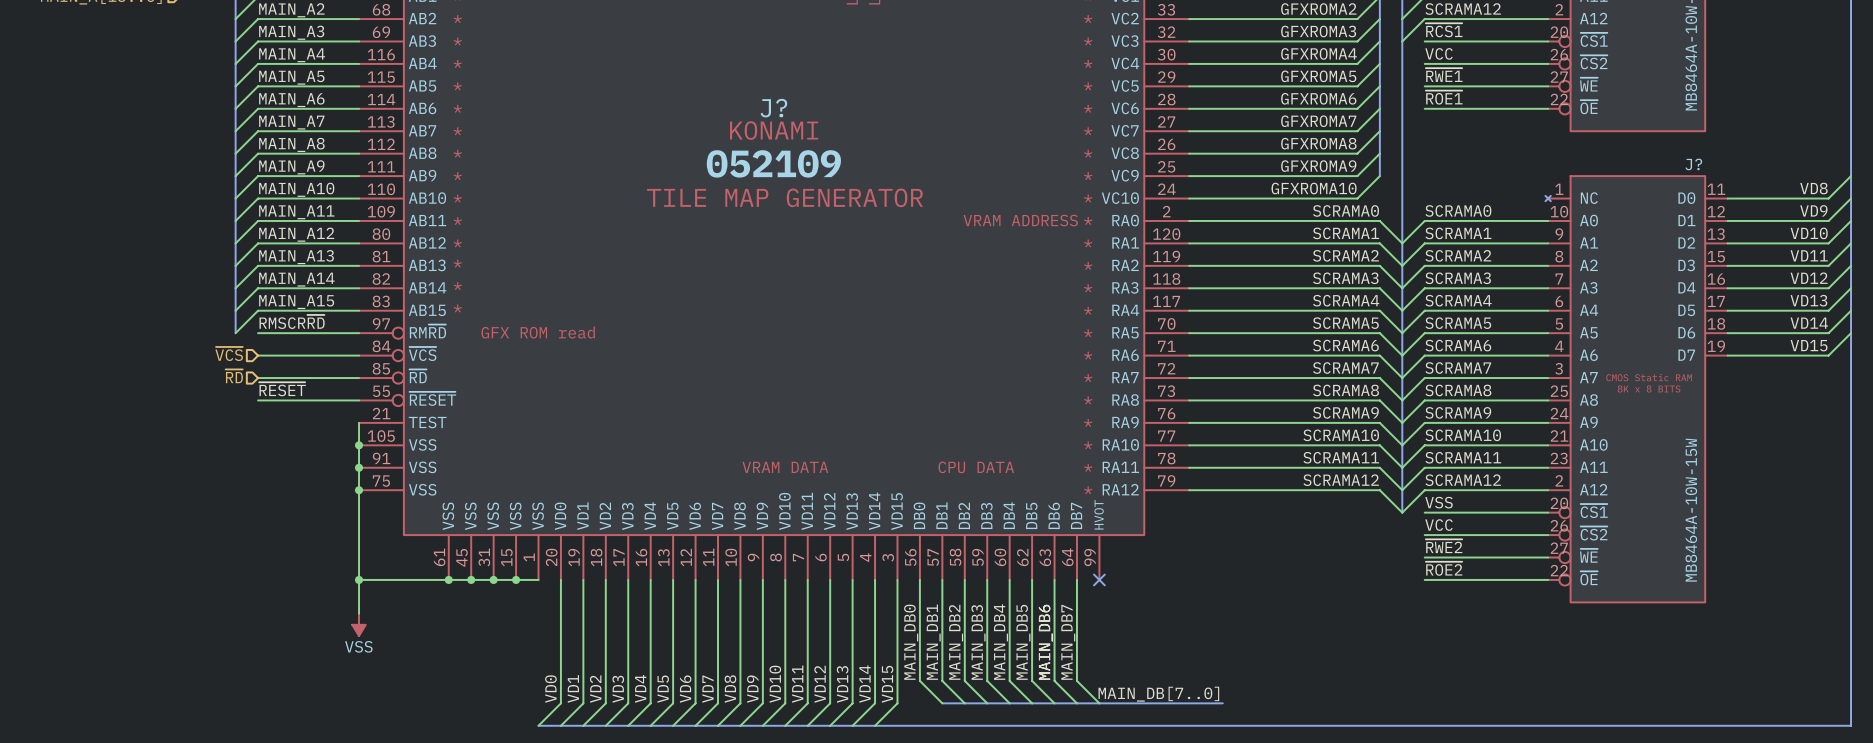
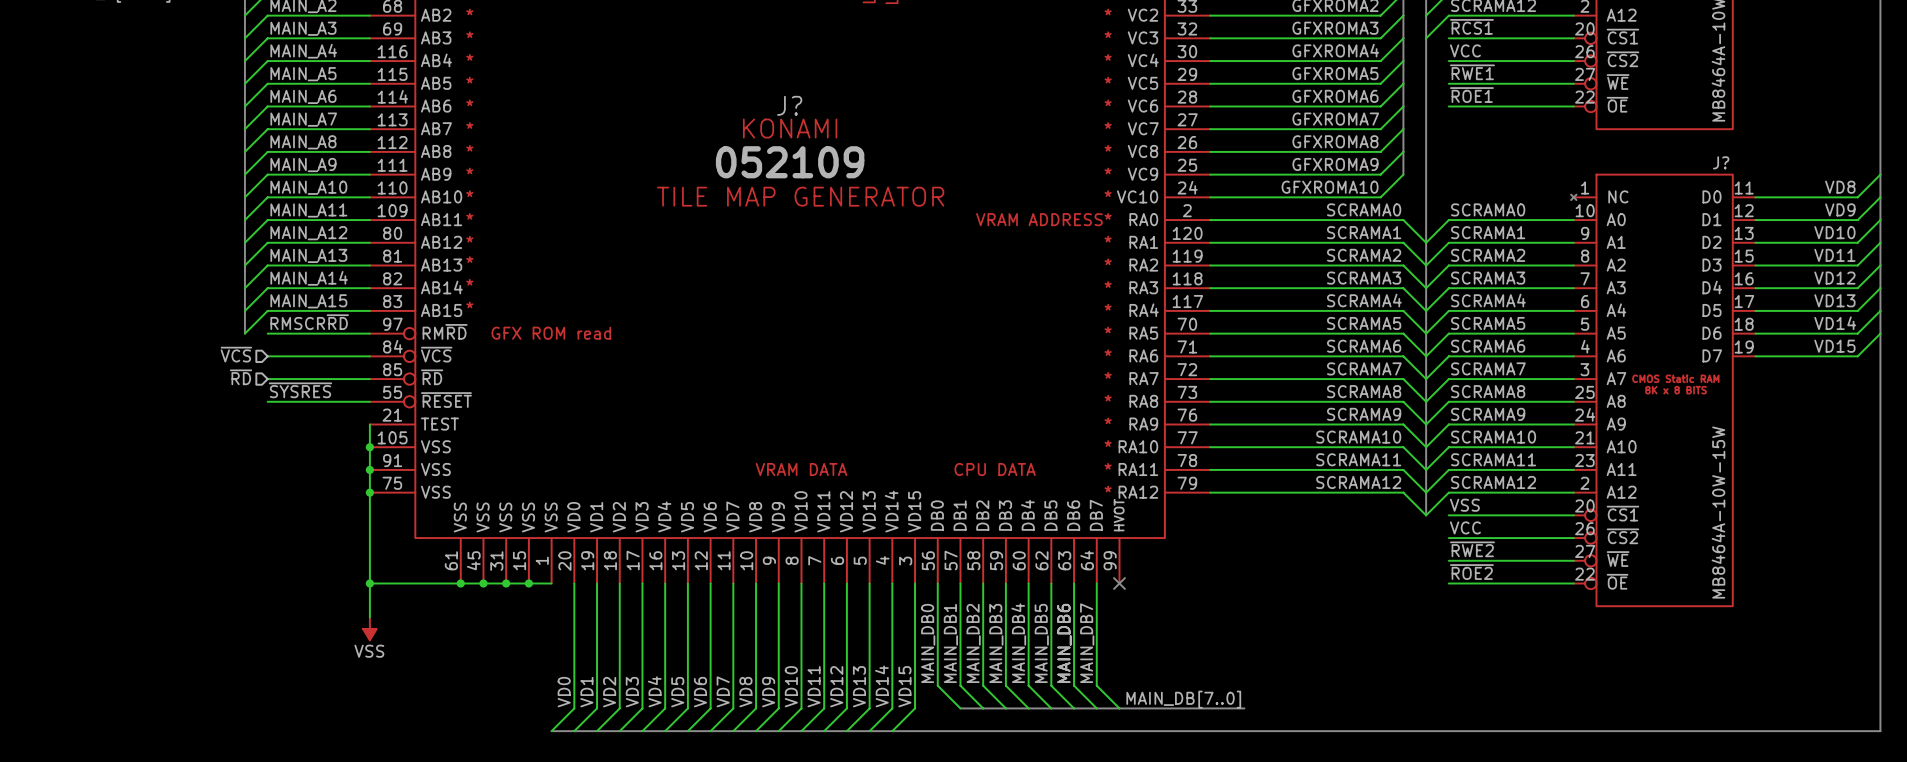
label: ~{RESET} (282, 389) -> ~{SYSRES} (300, 390)

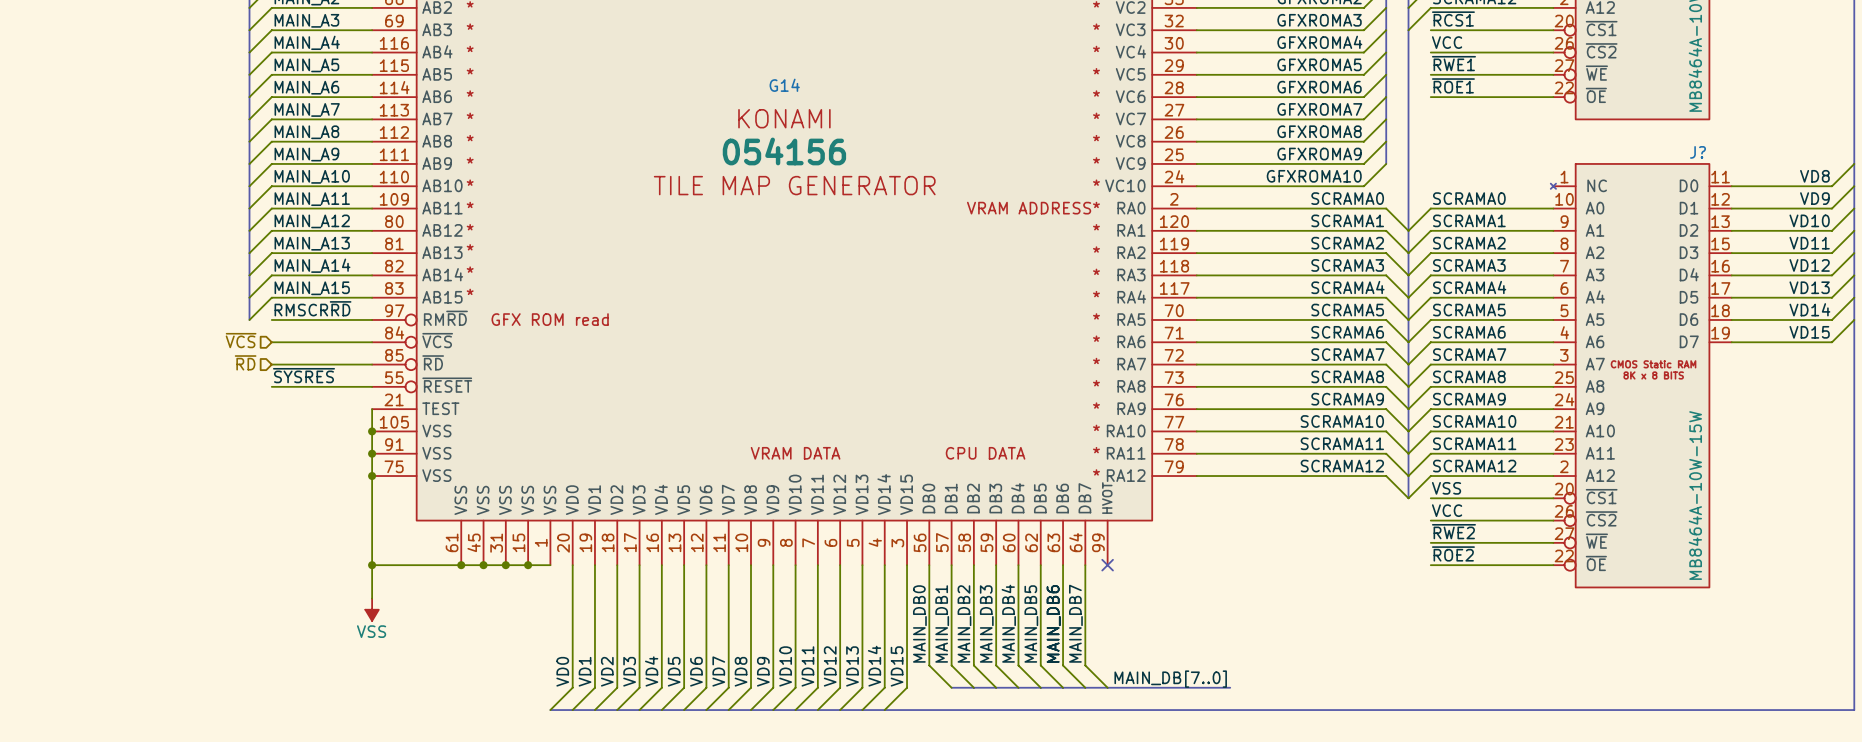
J? name: J? (789, 105) -> G14 (784, 85)
J? value: 052109 (790, 162) -> 054156 (784, 151)

